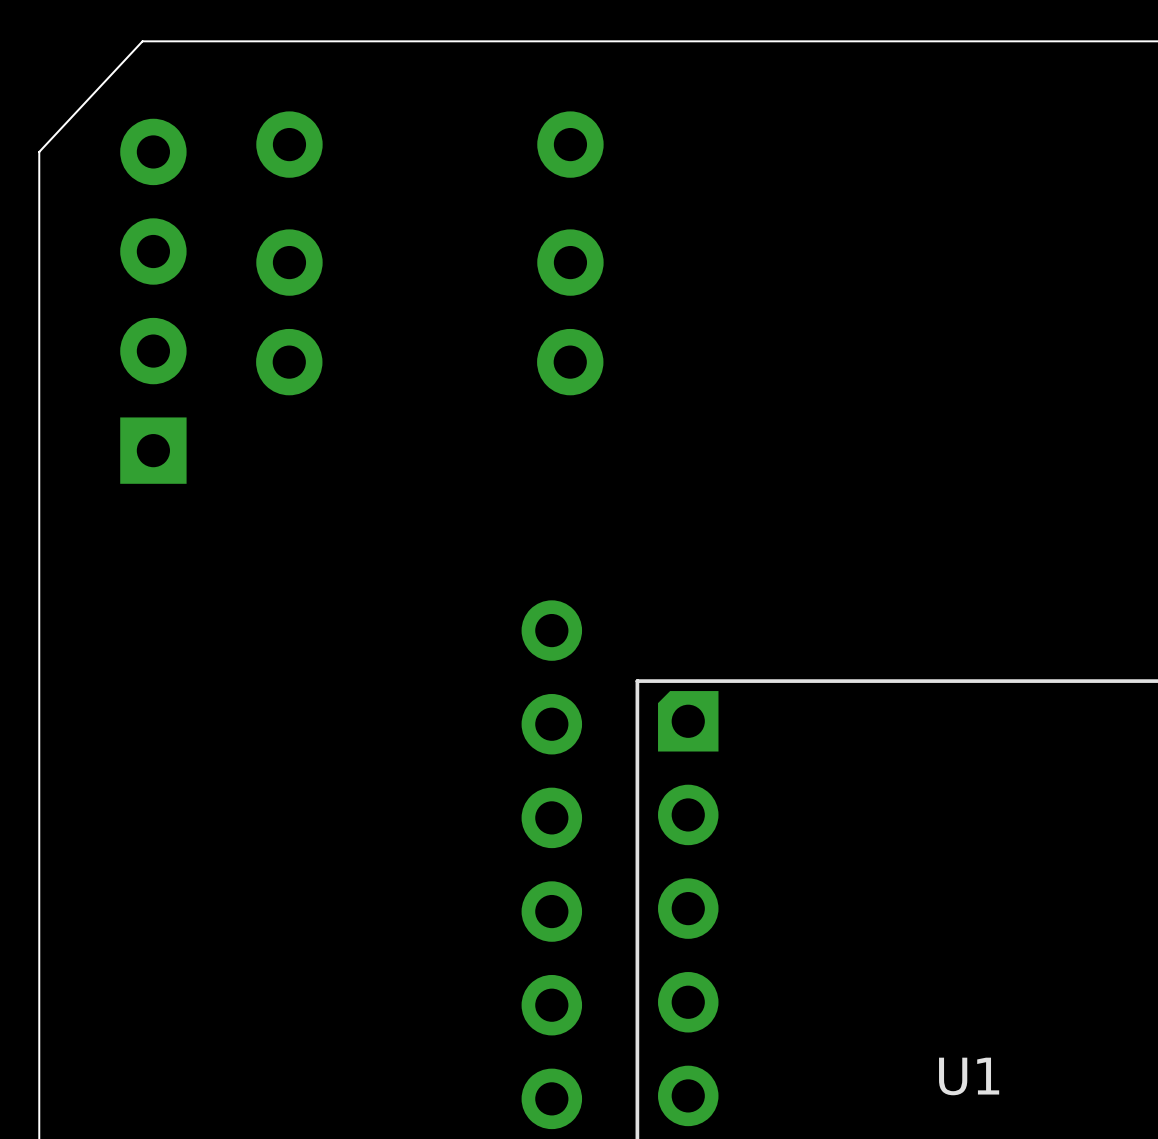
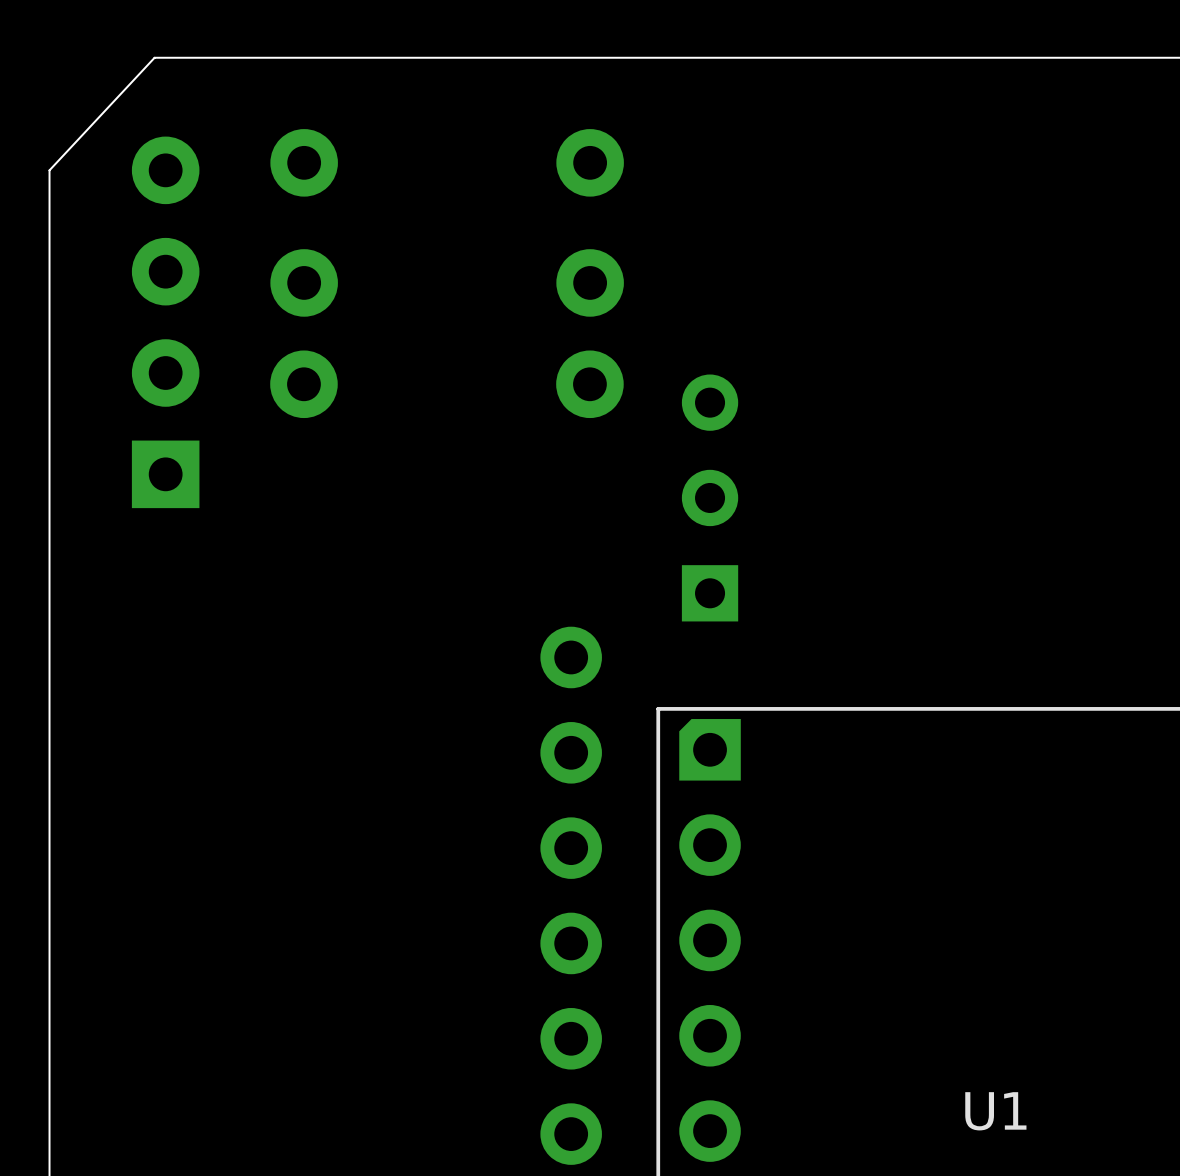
part: none -> (710, 497)

